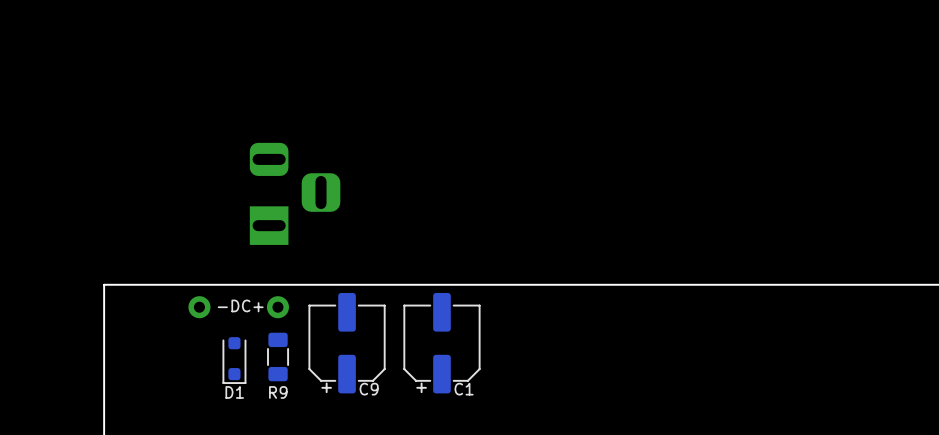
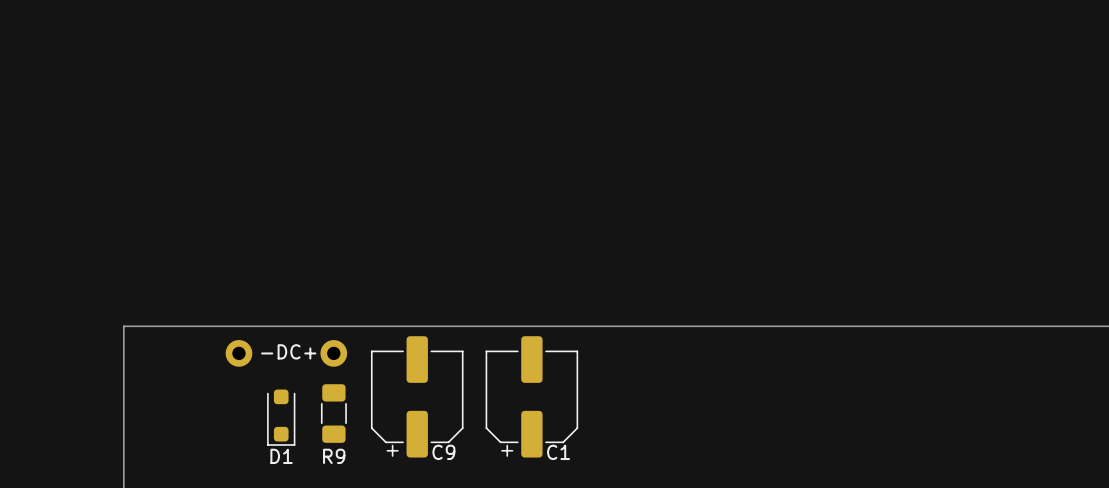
part: (295, 193) -> none

